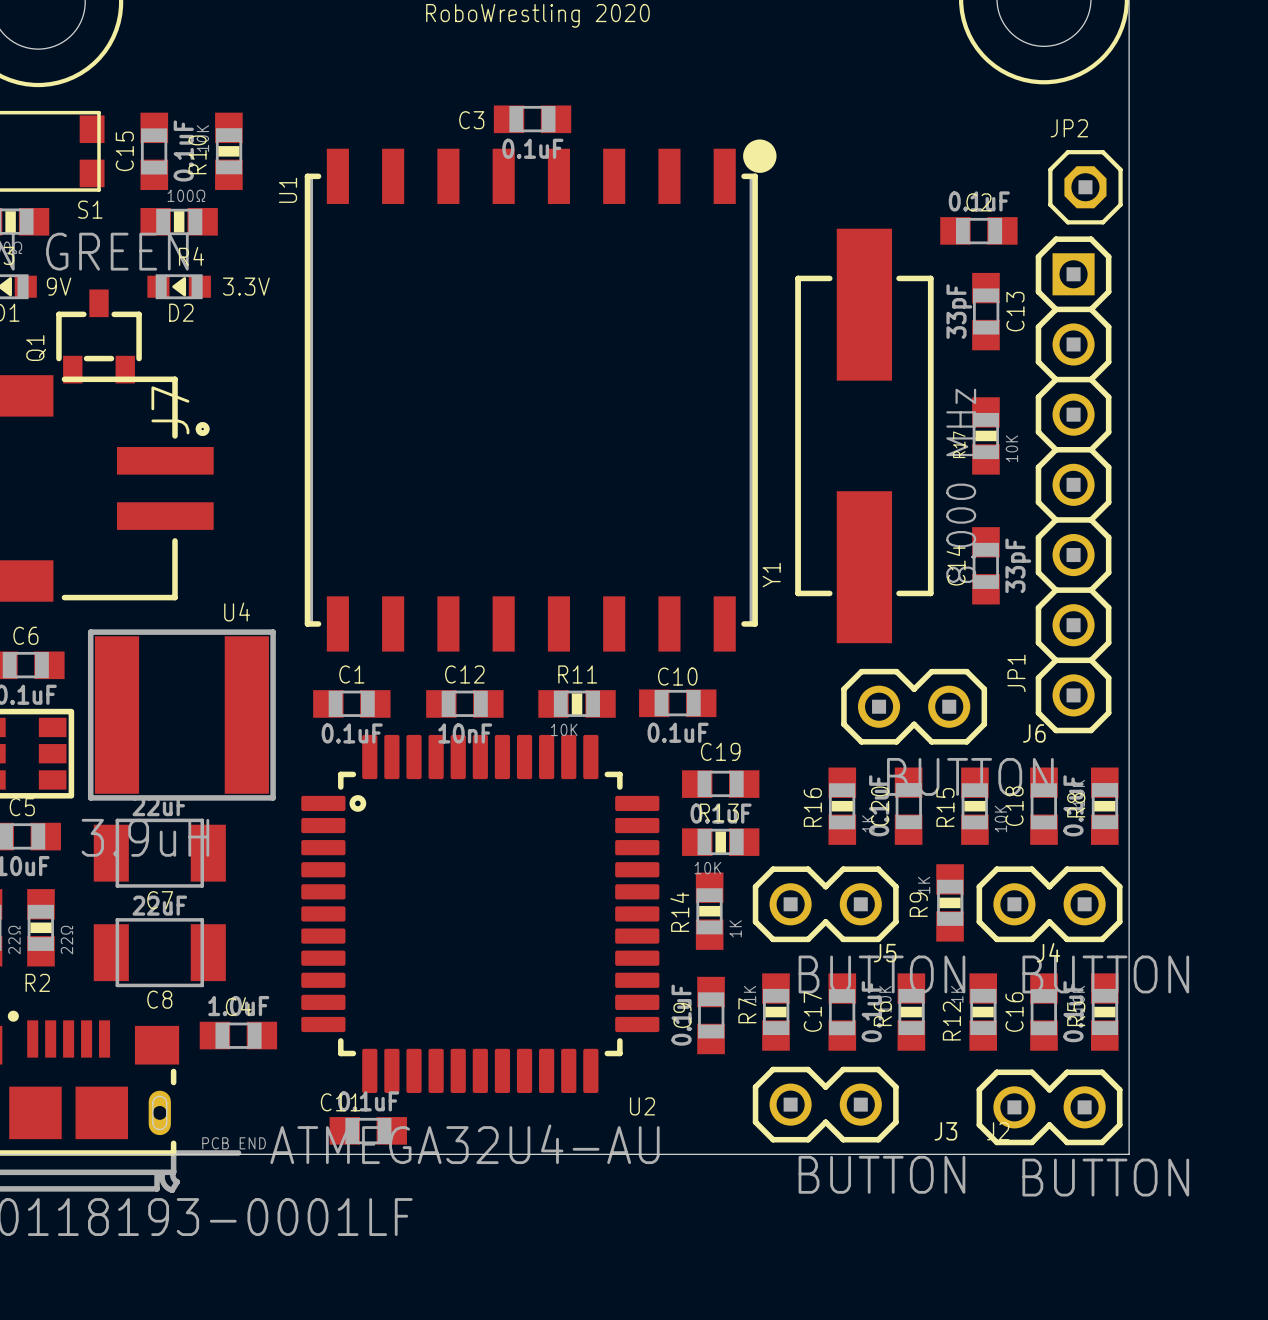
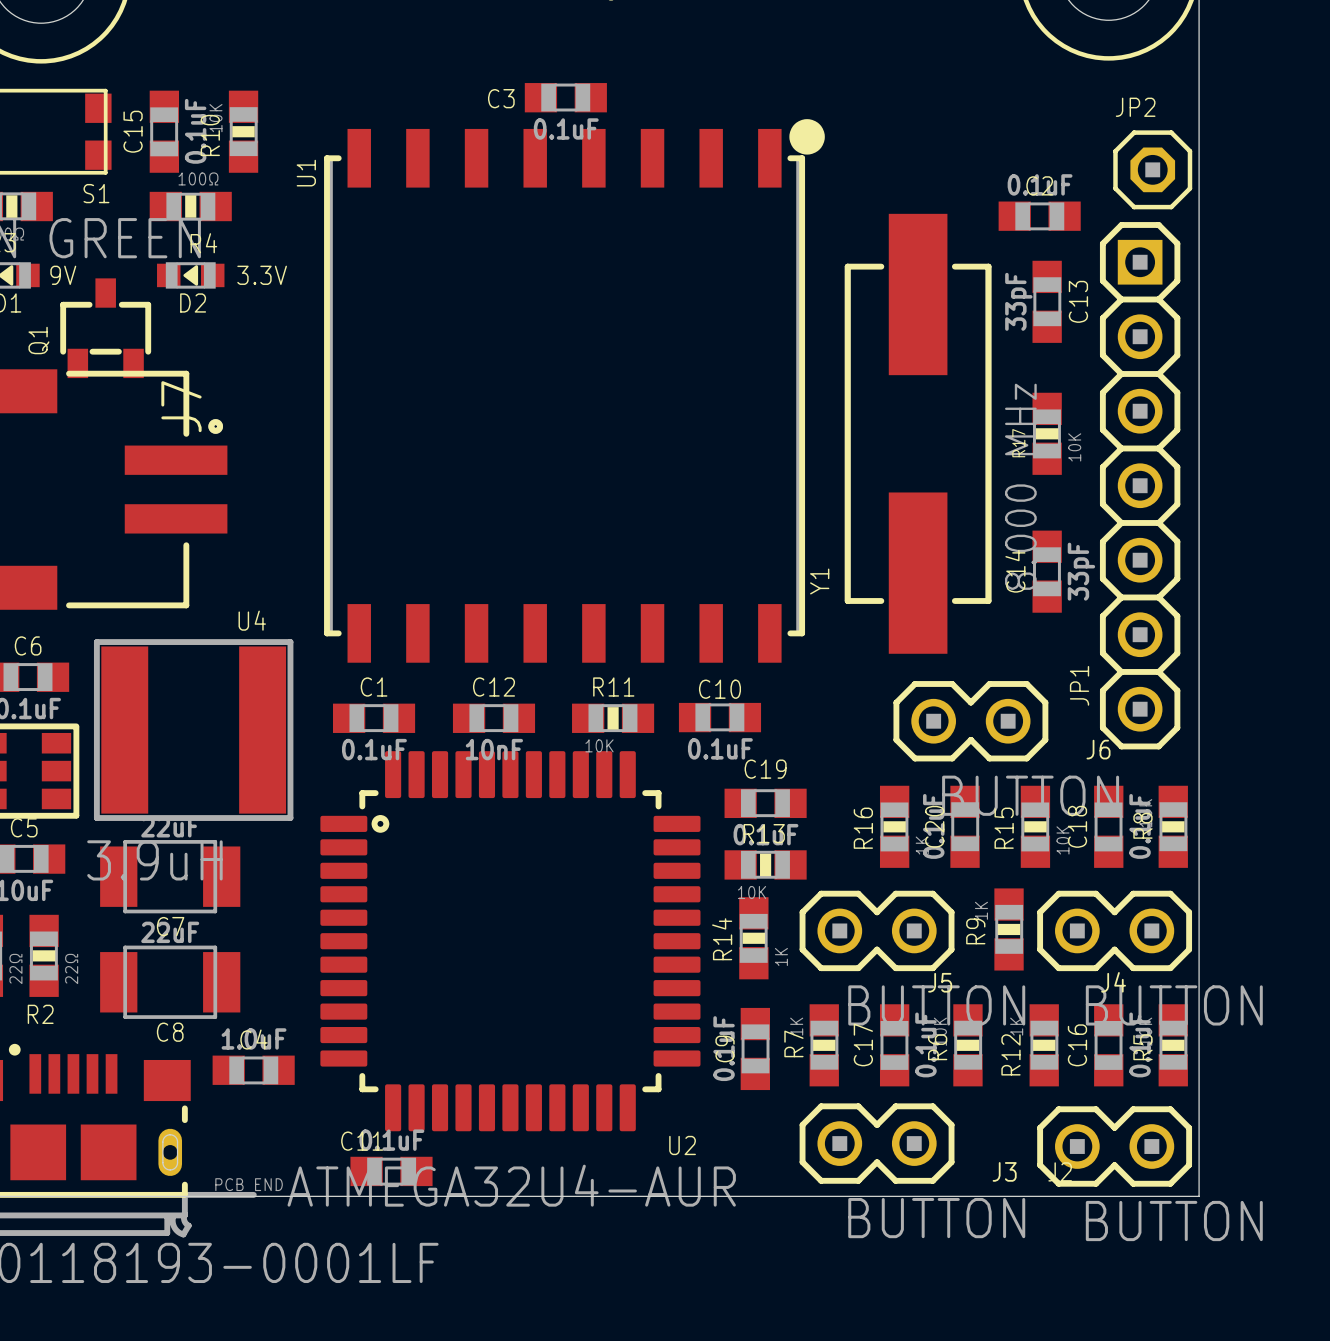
U2 value: ATMEGA32U4-AU (464, 1144) -> ATMEGA32U4-AUR (511, 1185)

